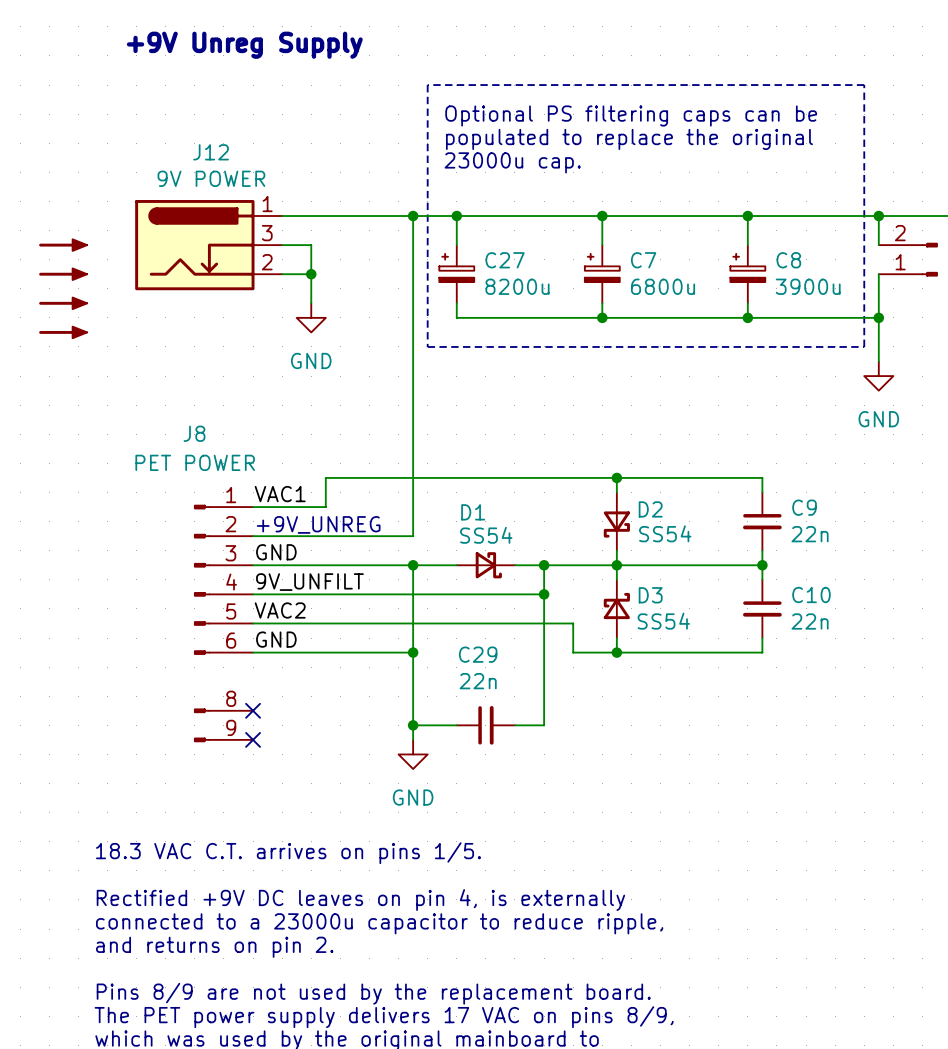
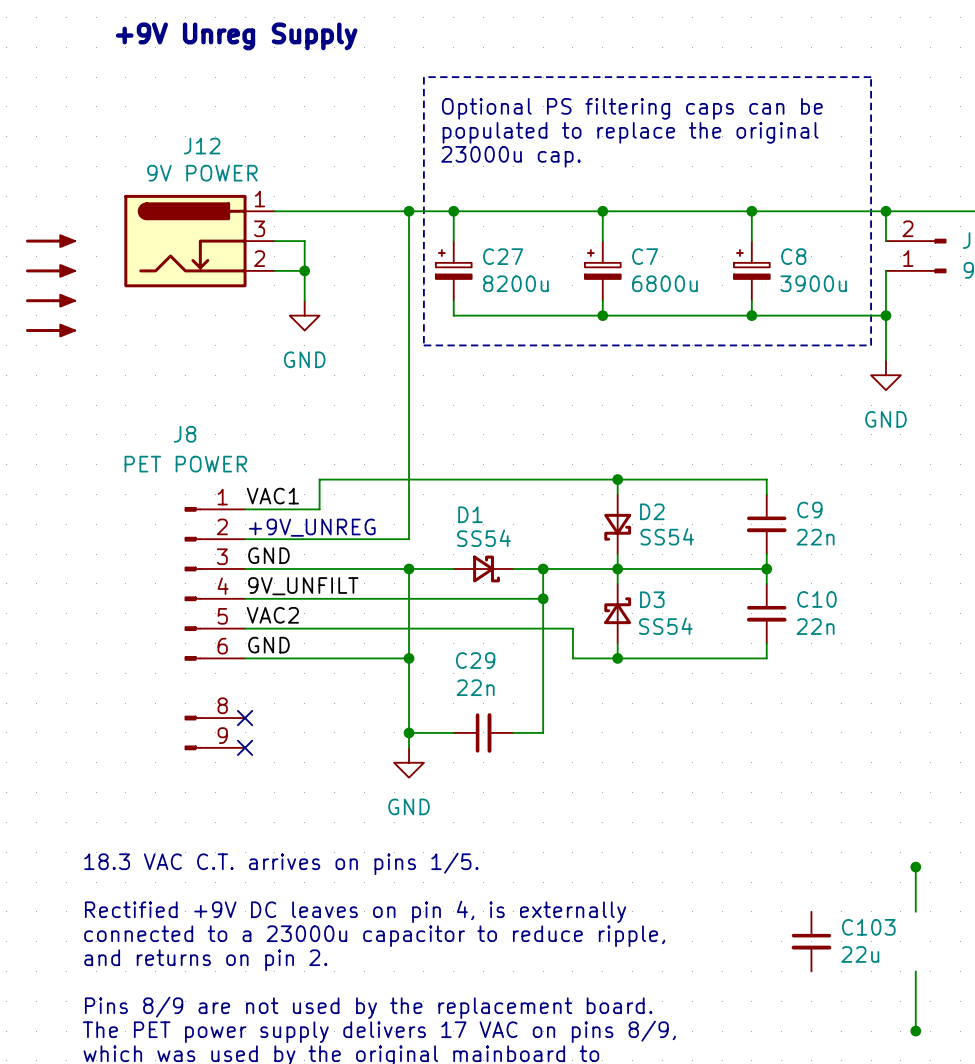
wire: none -> (915, 867) (915, 911)
junction: none -> (915, 867)
C103: none -> 22u (811, 941)
wire: none -> (915, 971) (915, 1031)
junction: none -> (915, 1031)

